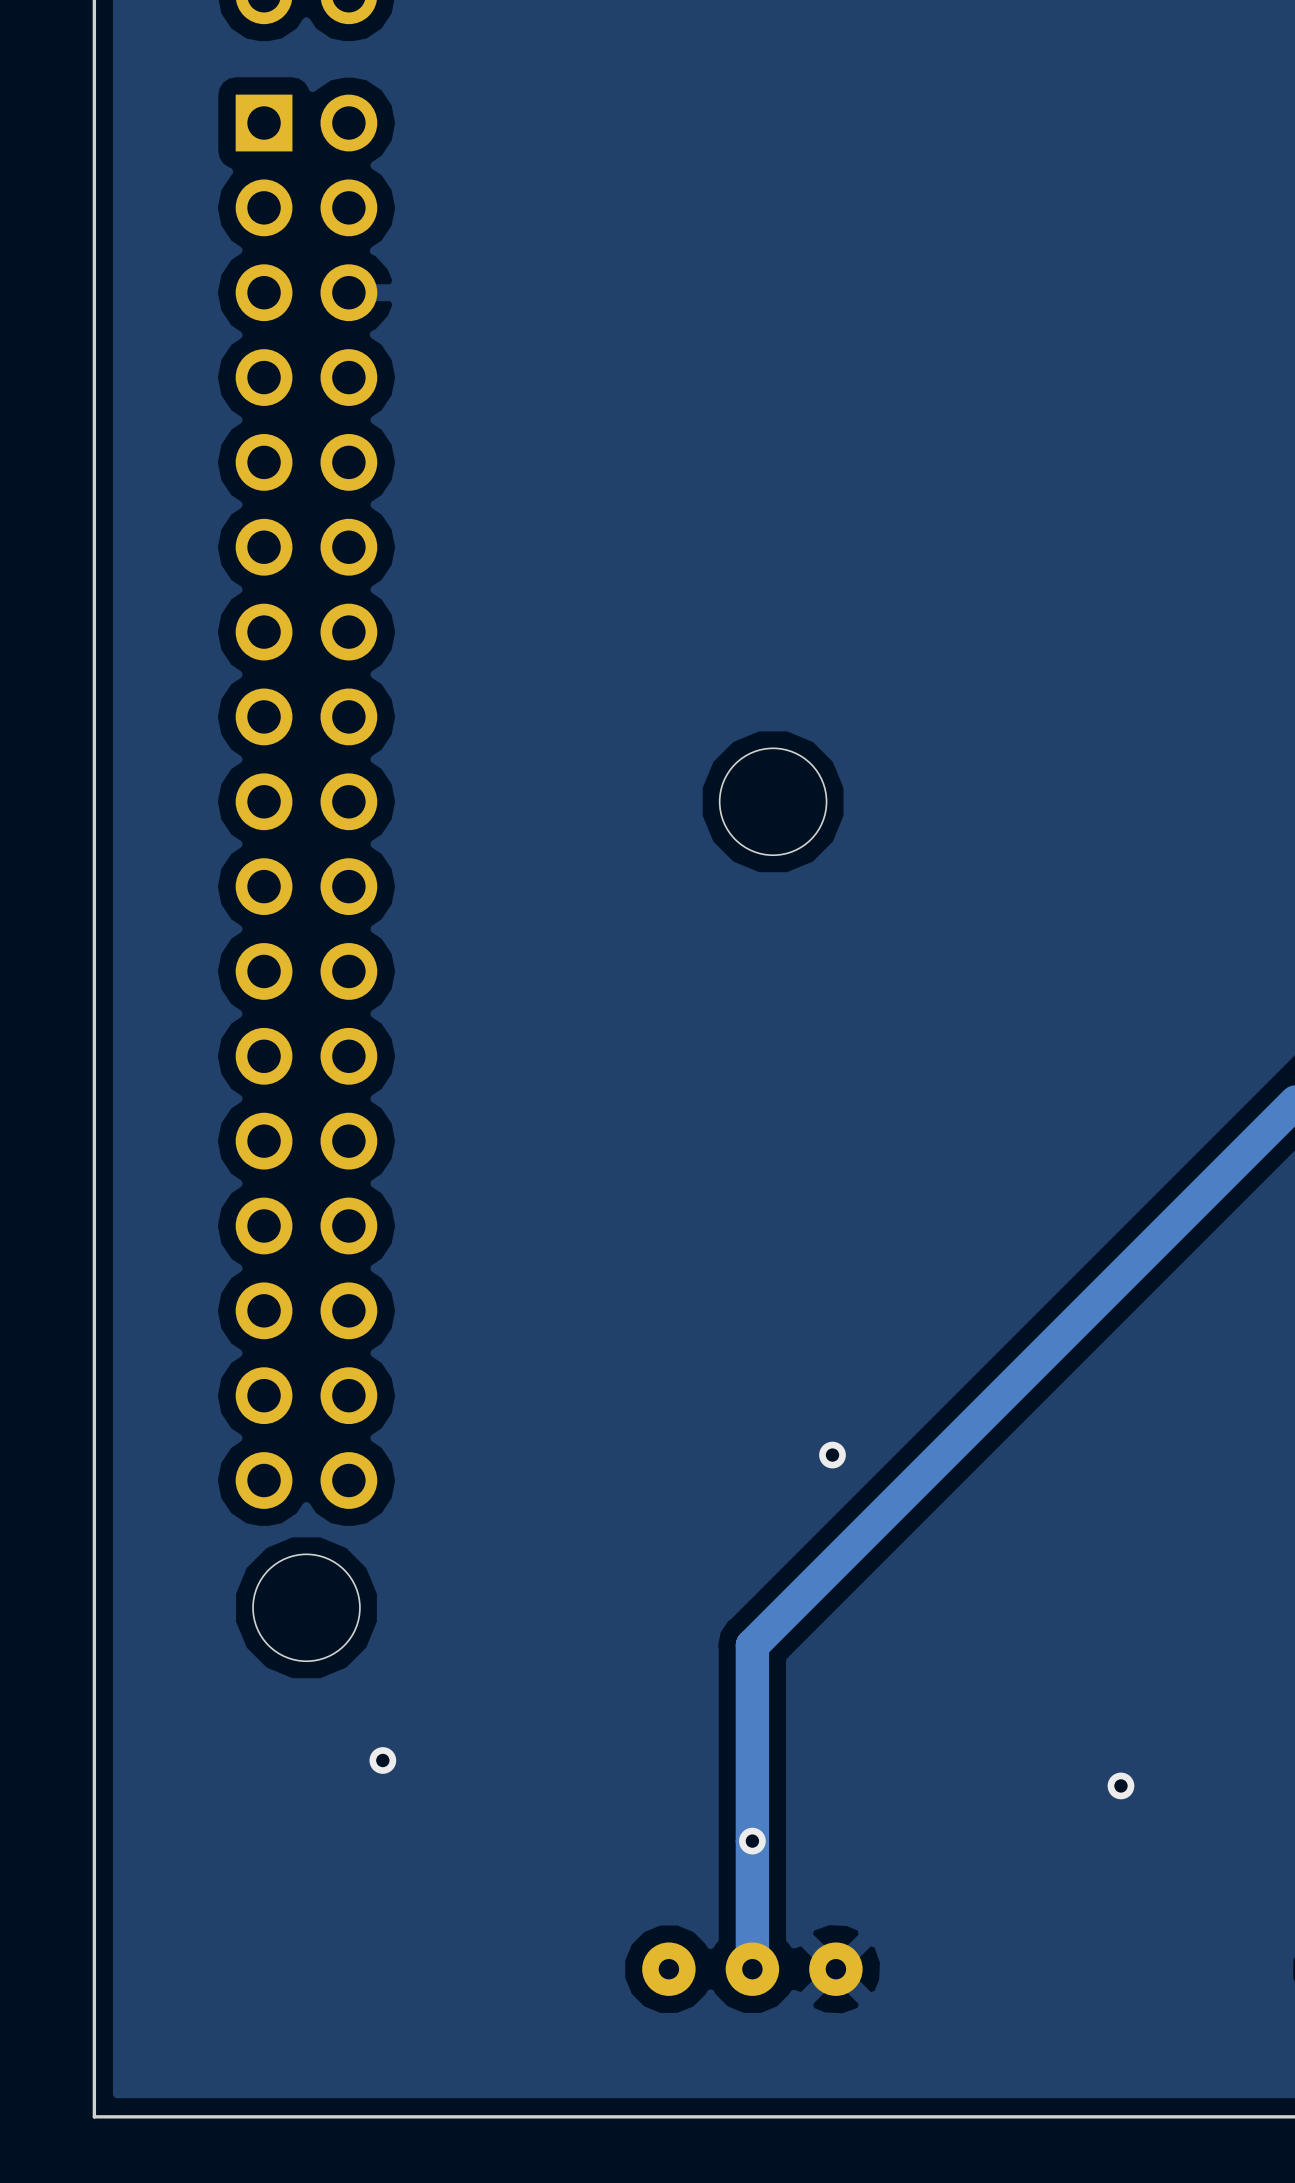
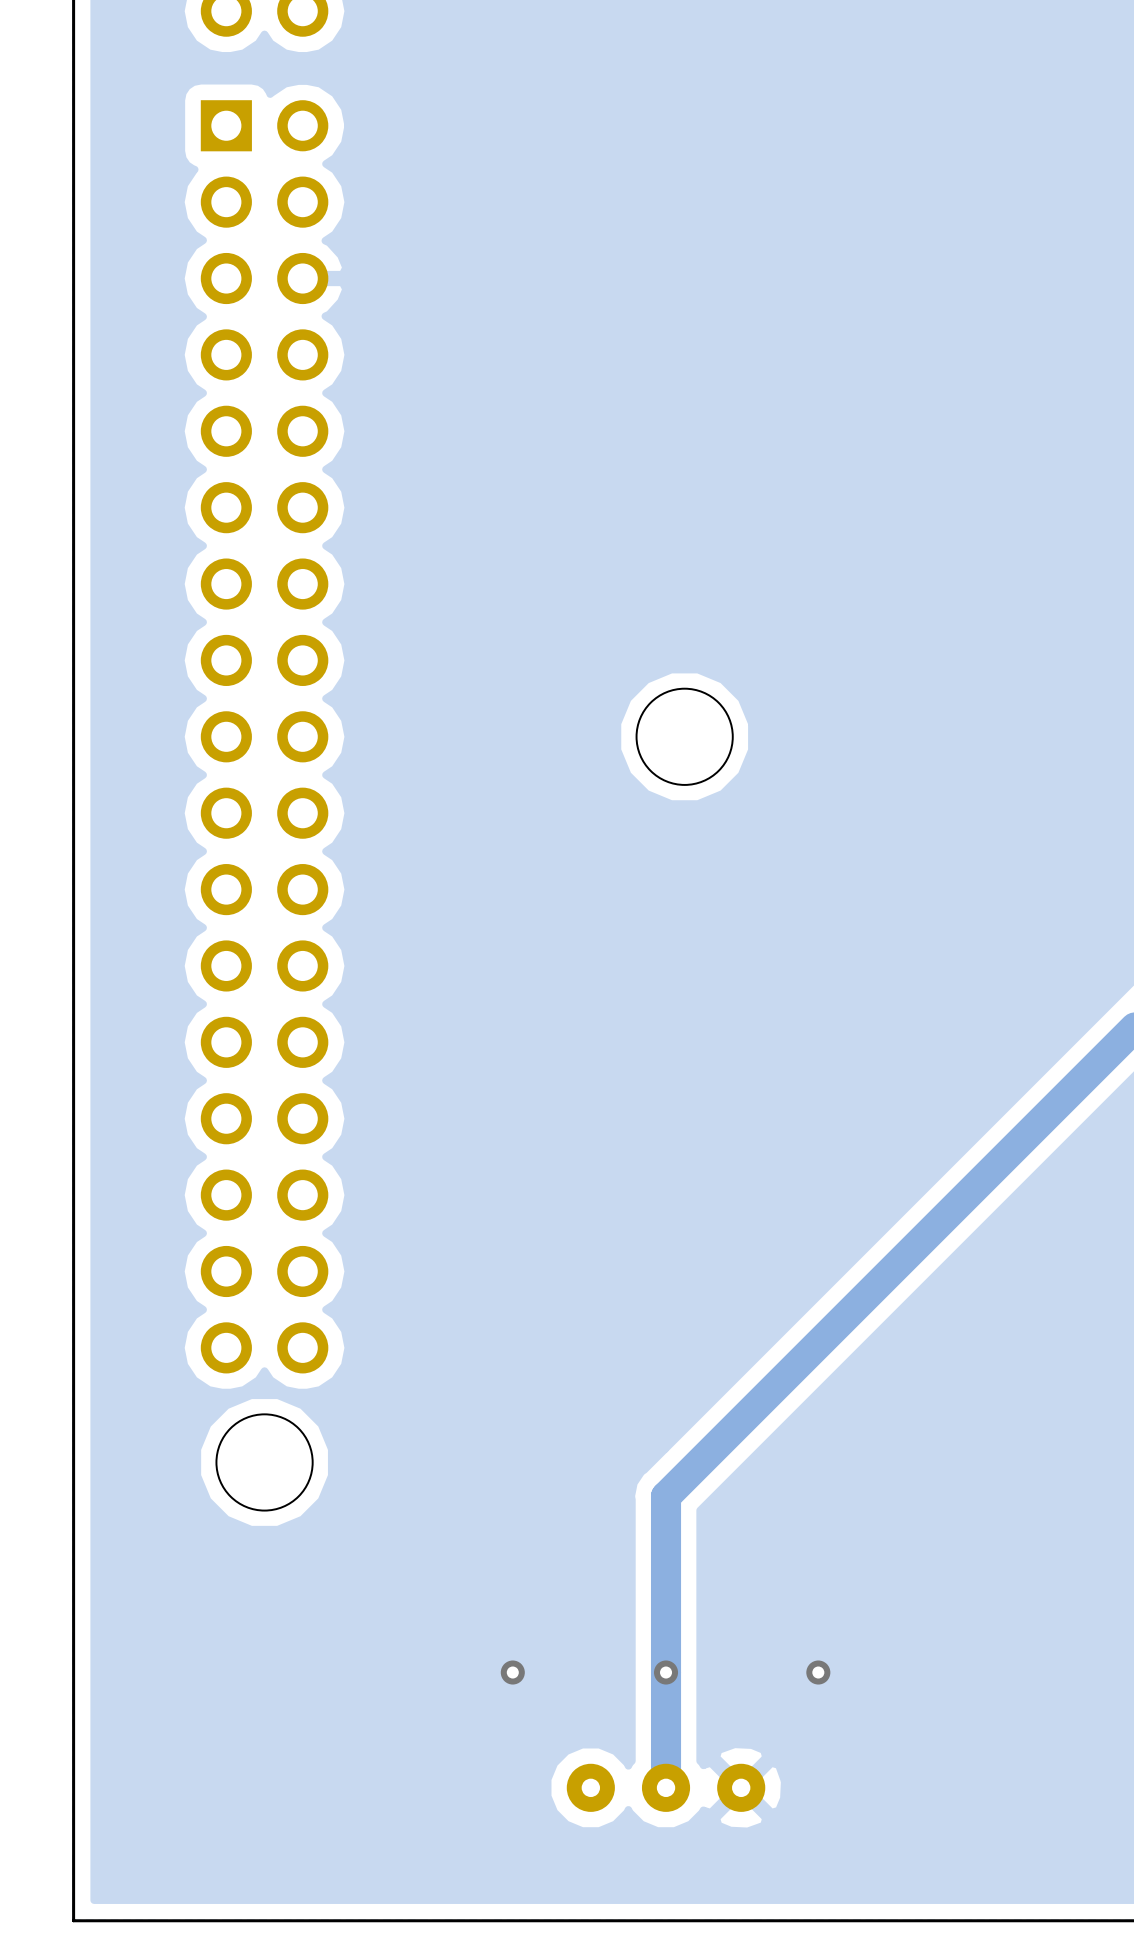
via: (832, 1455) -> none
via: (382, 1760) -> none
via: (1120, 1785) -> none
via: none -> (512, 1672)
via: none -> (818, 1672)

